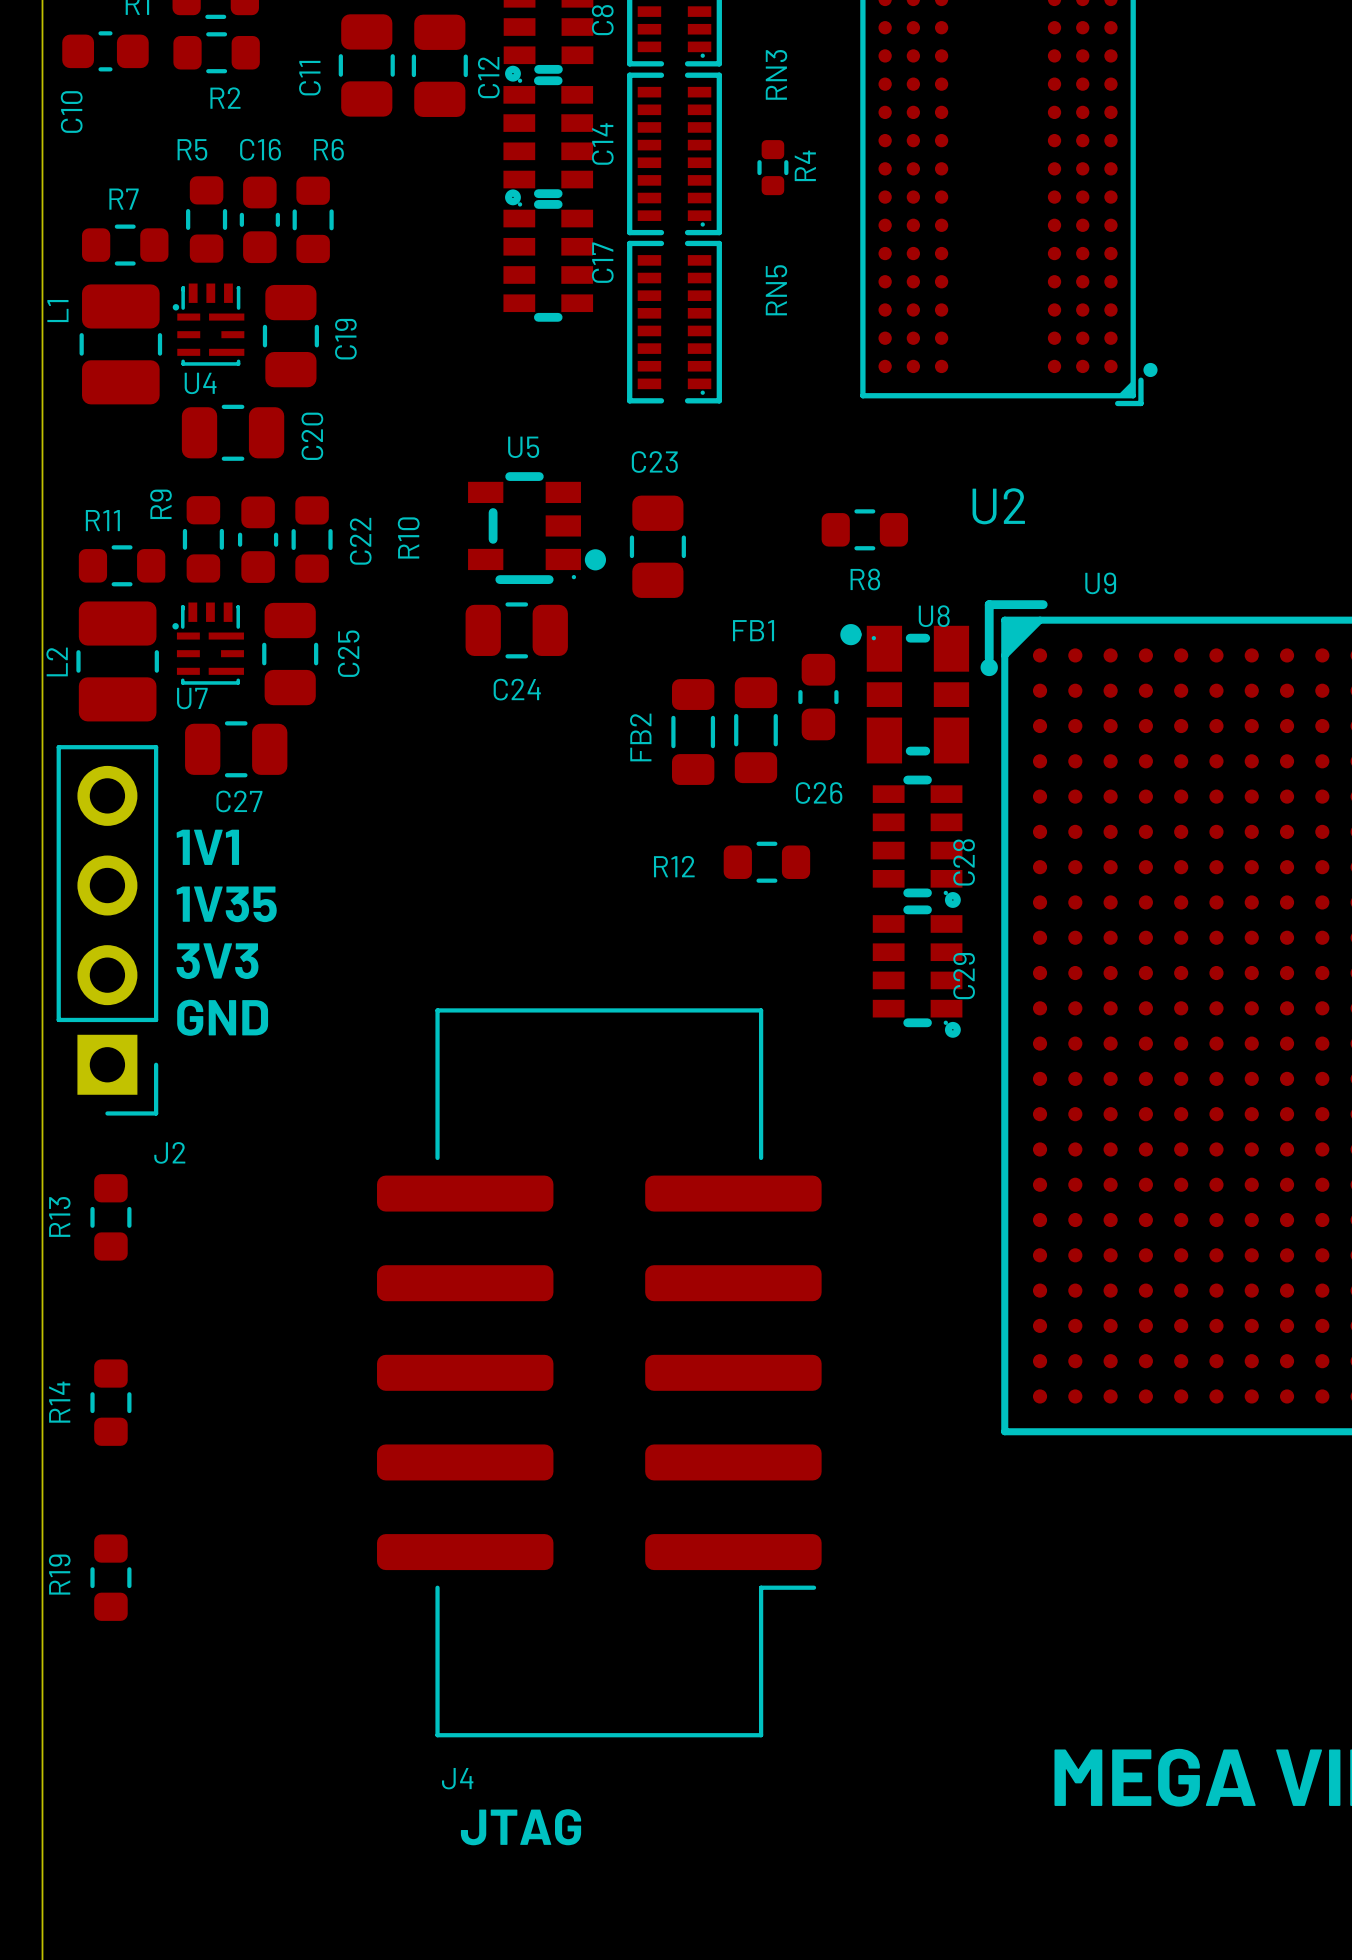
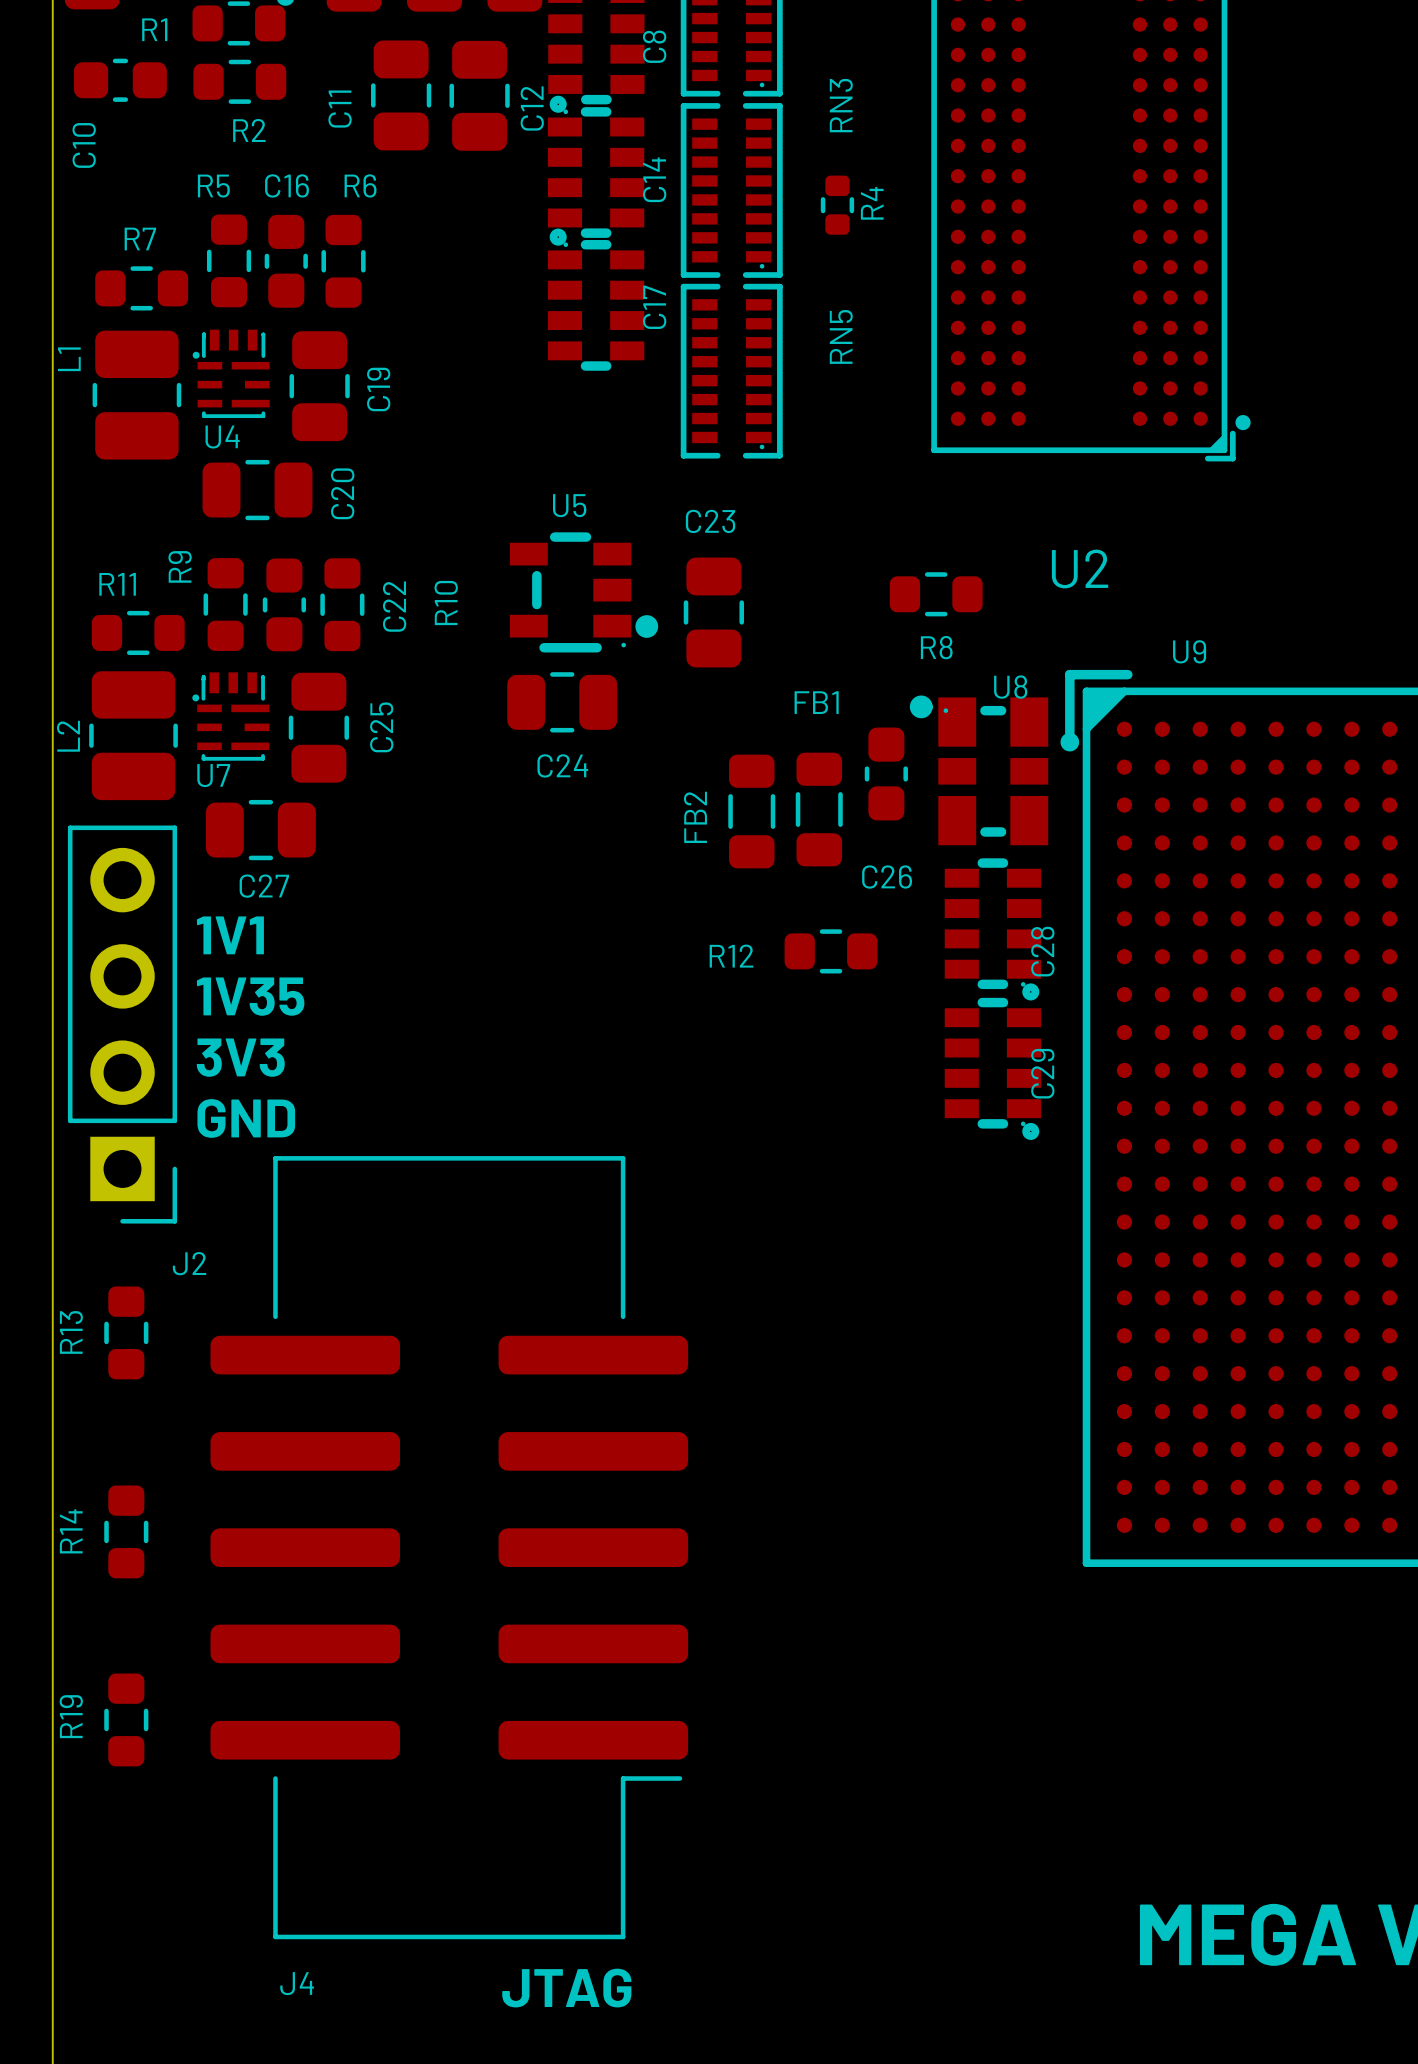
J4 position: (599, 1372) -> (449, 1547)

